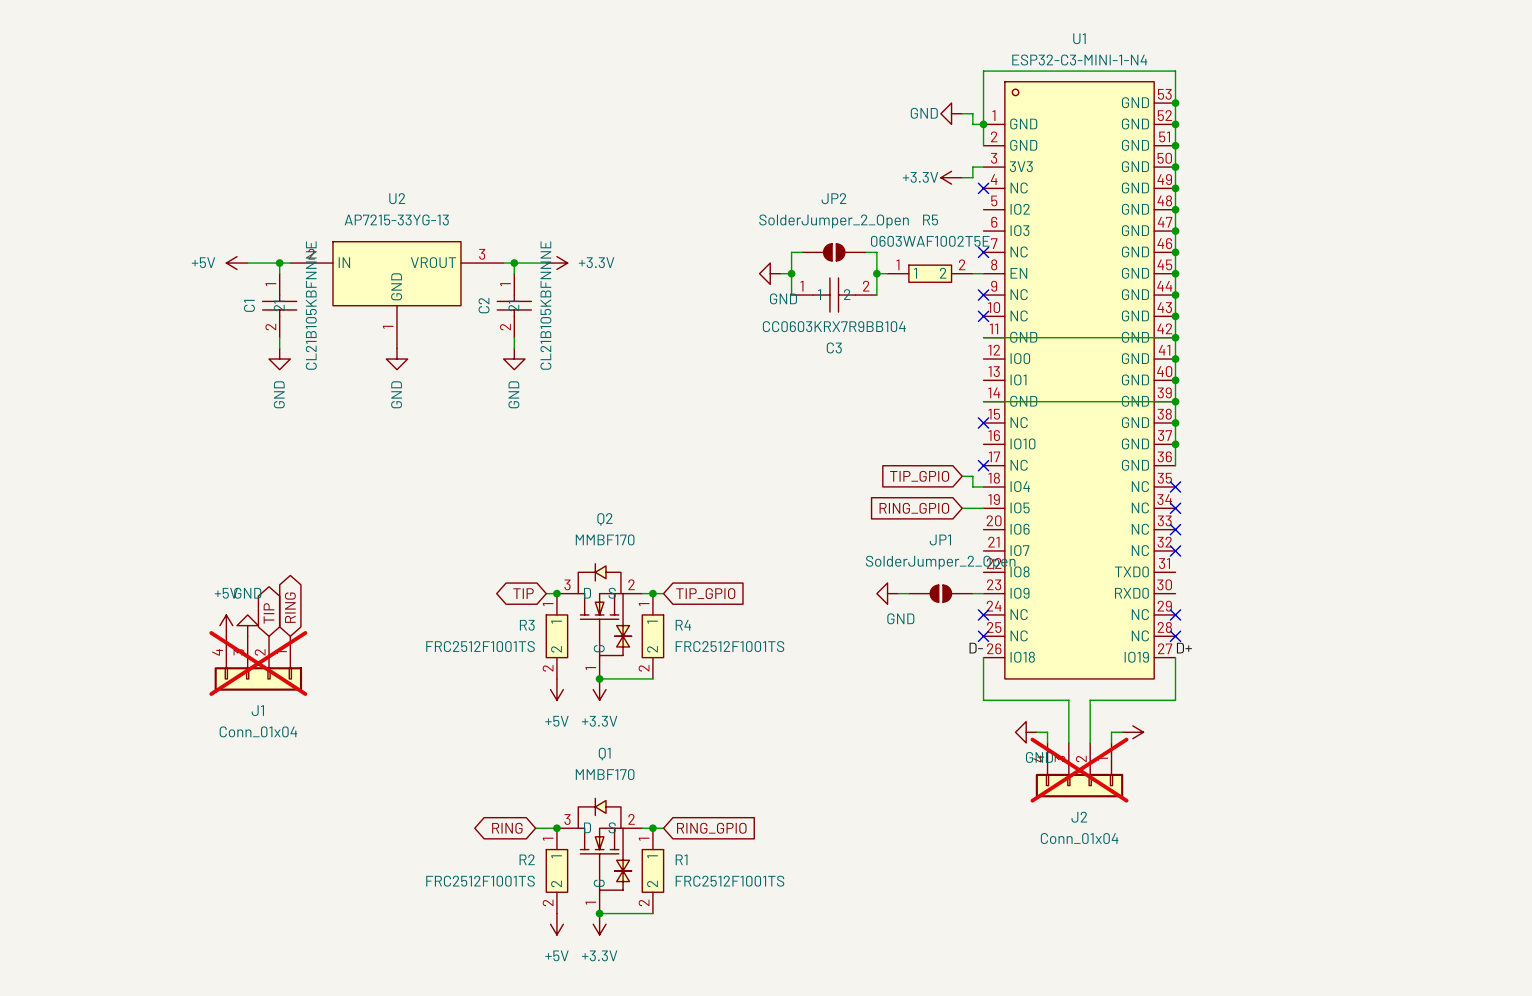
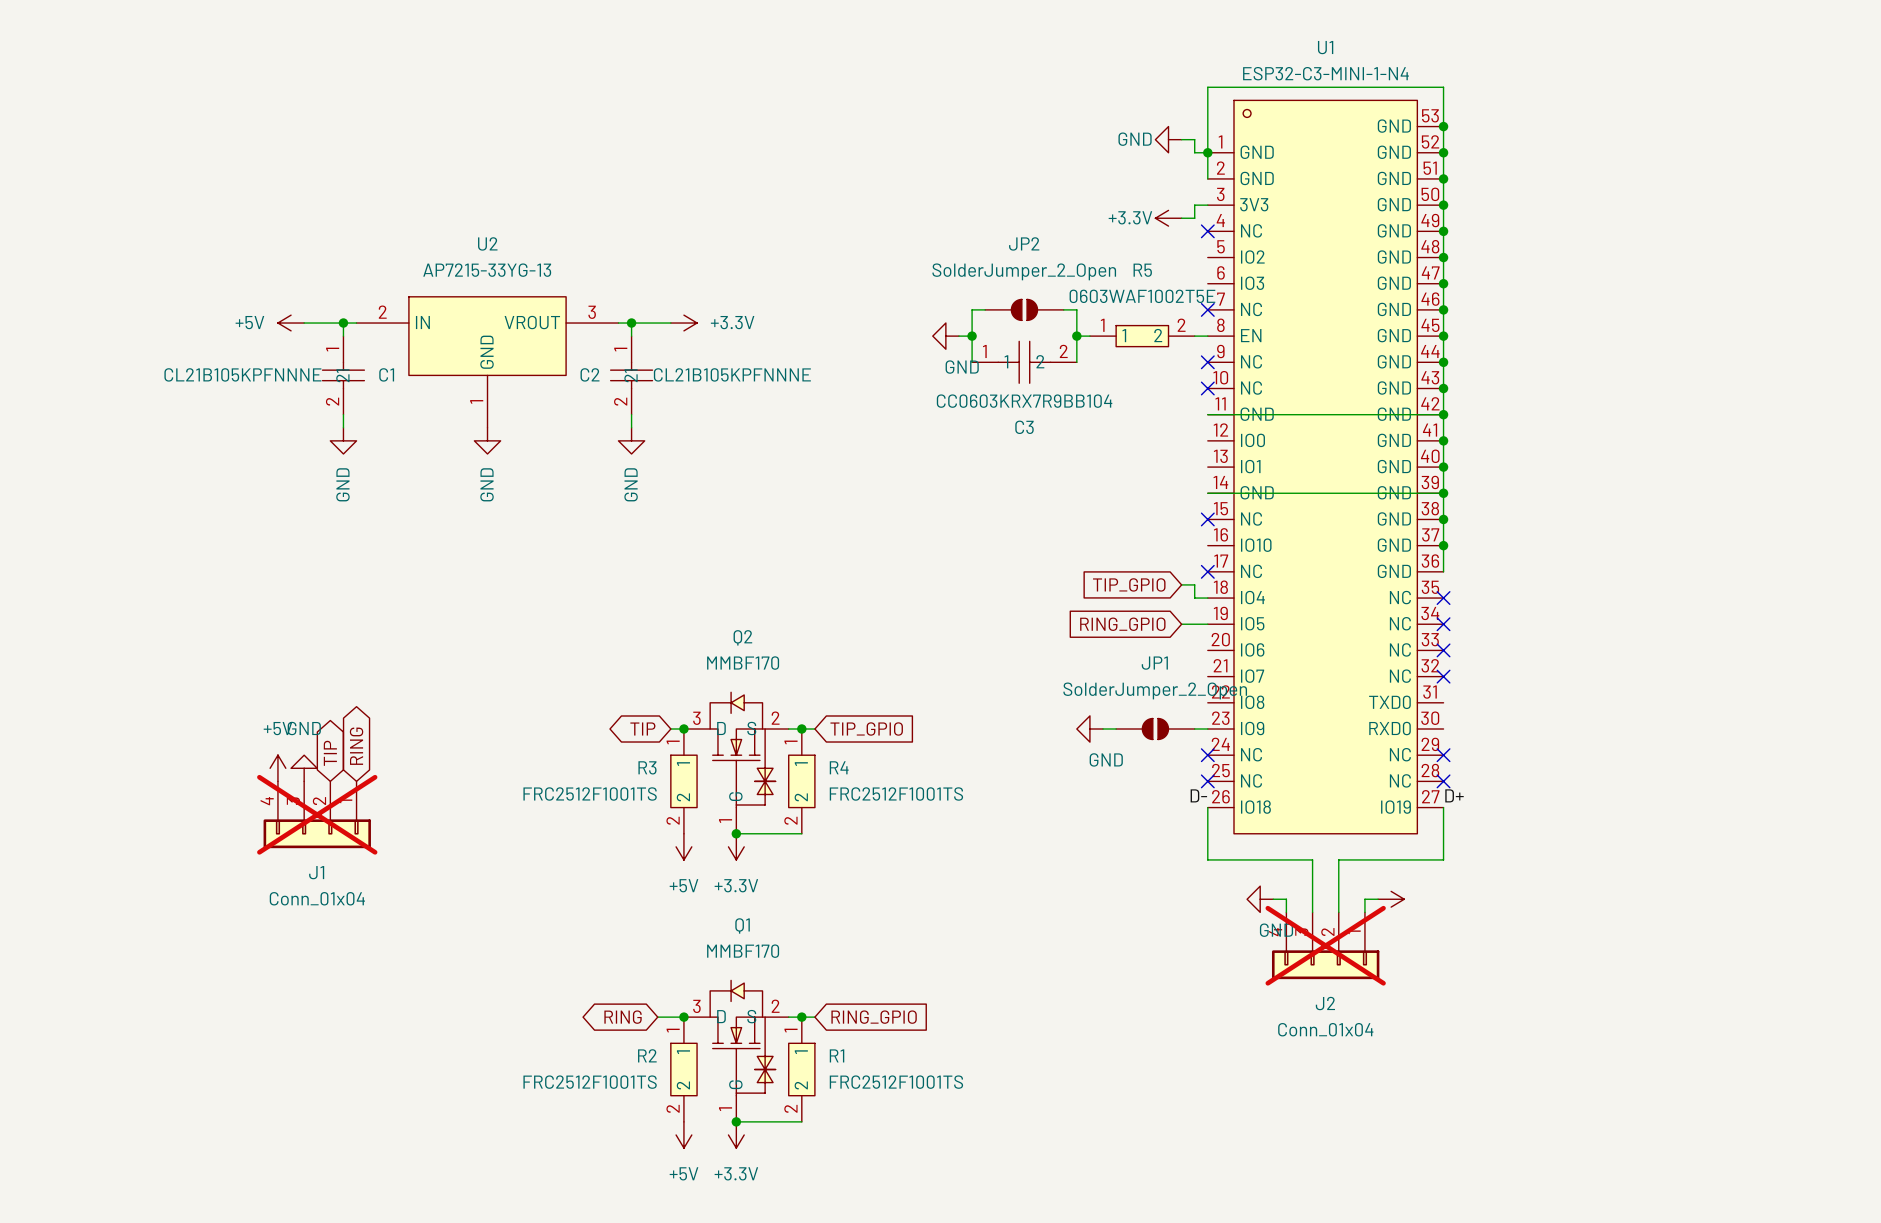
C1 name rotation: 0° (249, 305) -> 90° clockwise (386, 374)
C1 name position: C1 (249, 305) -> C1 (386, 374)
C1 value: CL21B105KBFNNNE (311, 305) -> CL21B105KPFNNNE (242, 374)
C2 name rotation: 0° (484, 305) -> 90° clockwise (590, 374)
C2 value: CL21B105KBFNNNE (545, 305) -> CL21B105KPFNNNE (732, 374)

